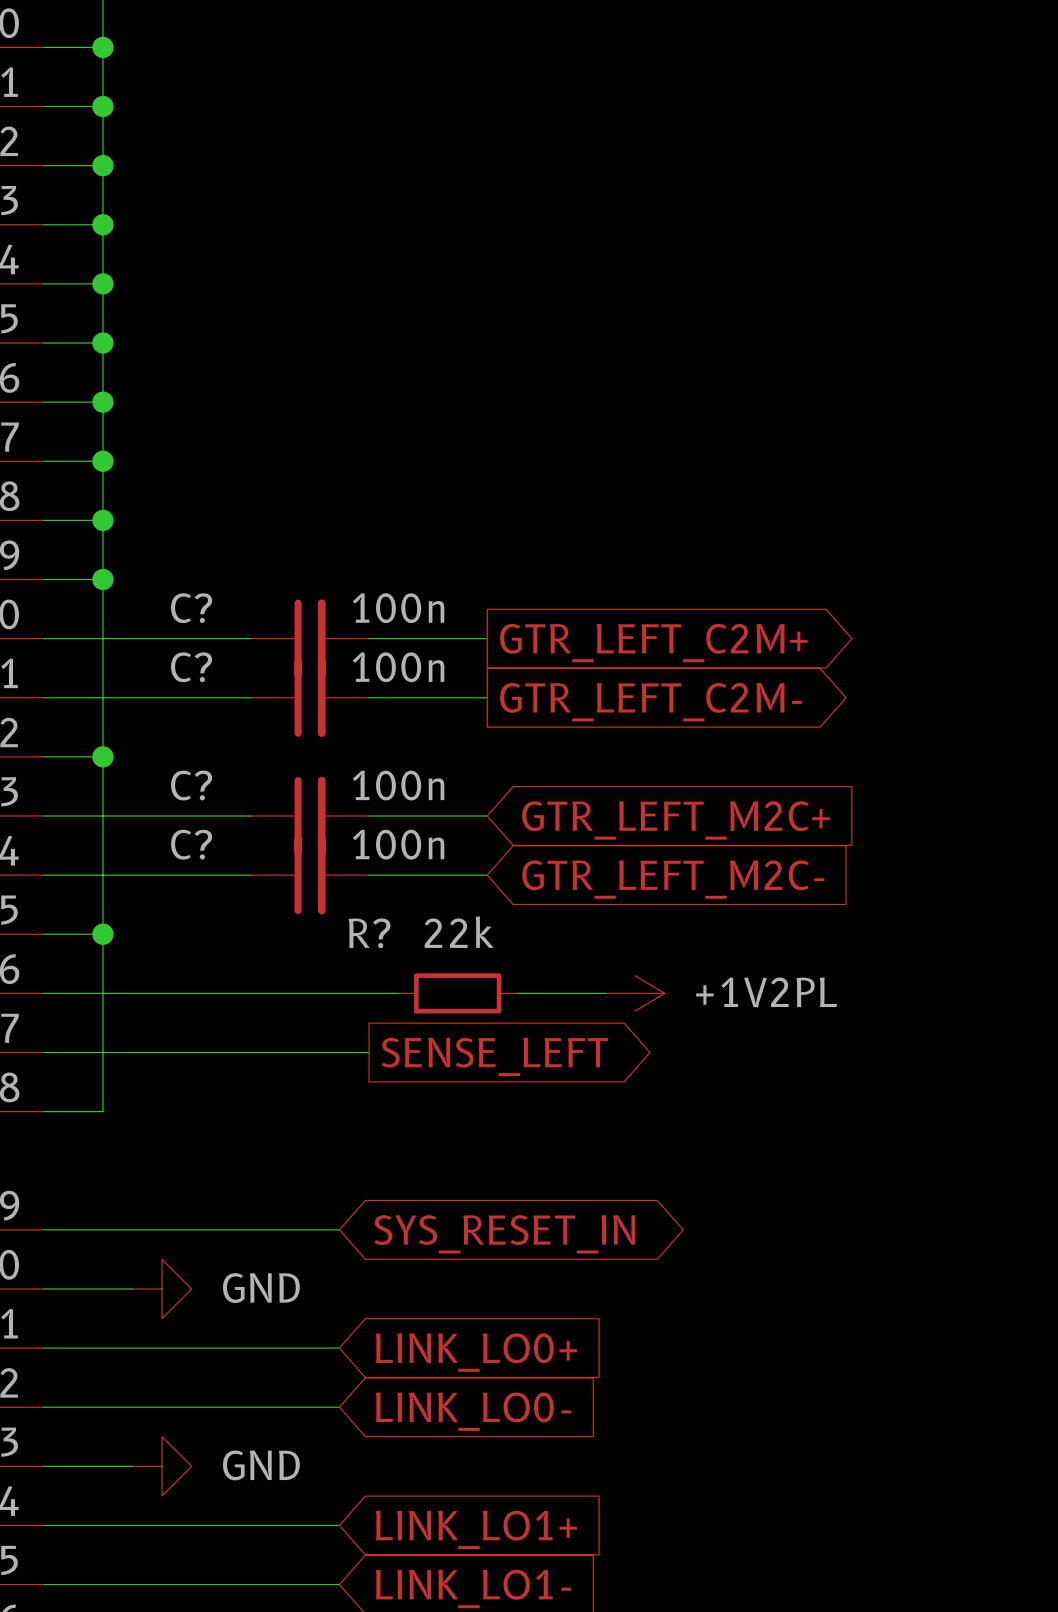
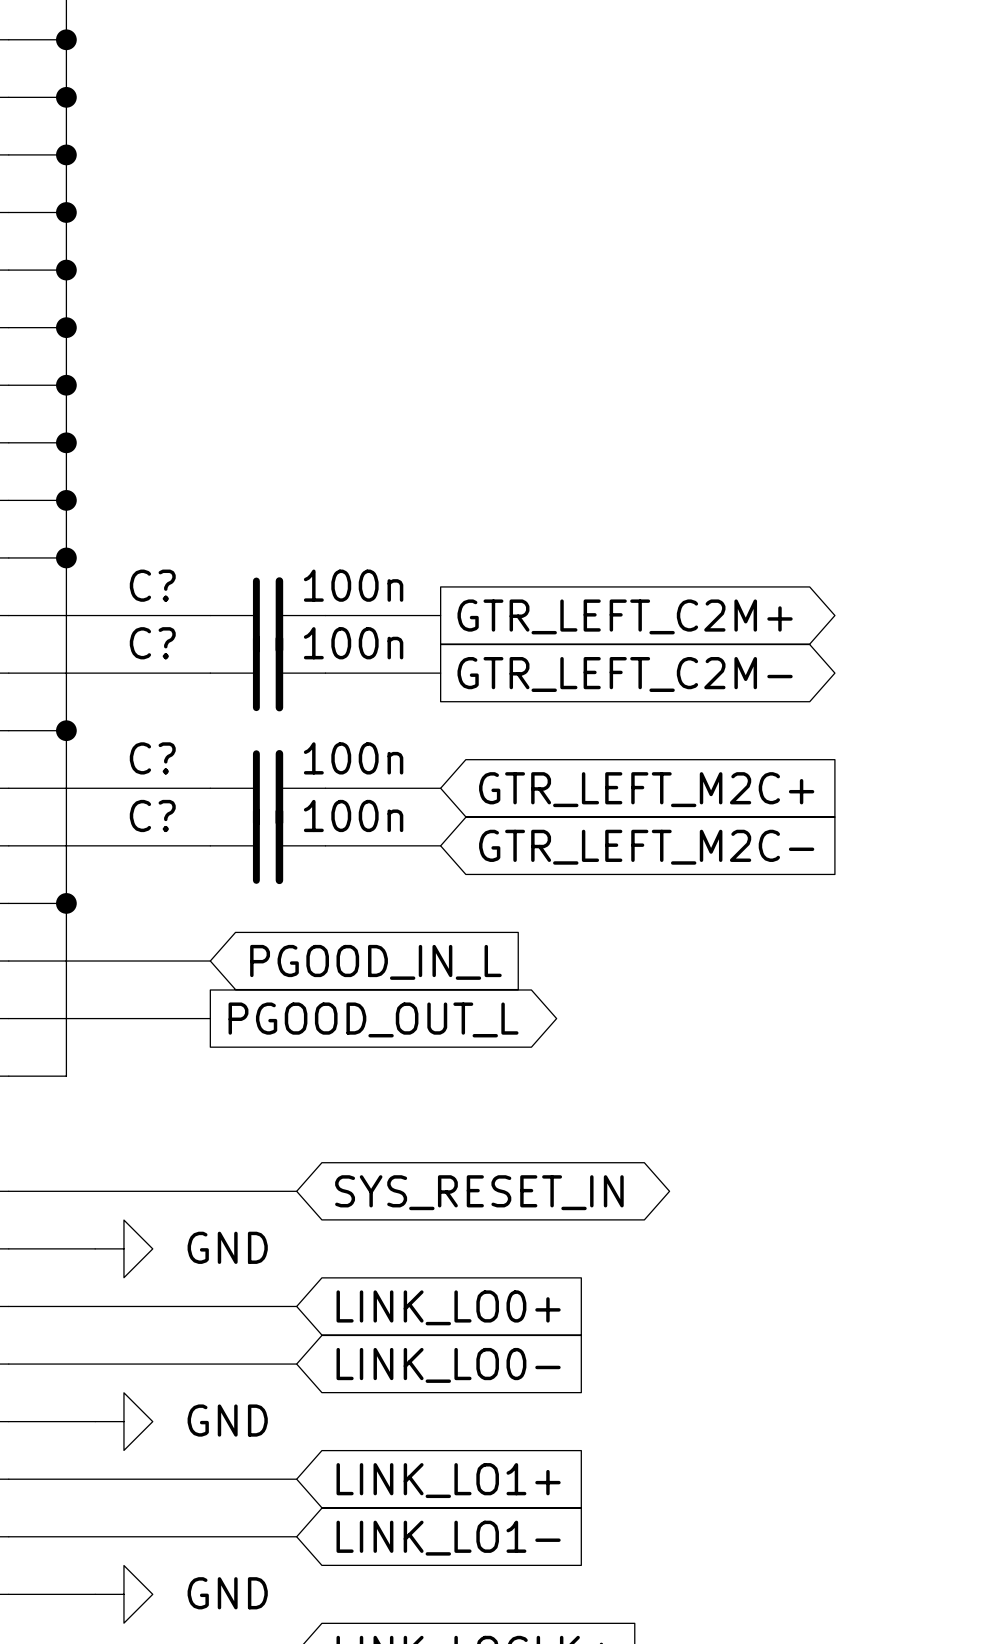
wire: (250, 993) (398, 993) -> none
R?: 22k (457, 993) -> none
wire: (516, 993) (605, 993) -> none
power symbol: +1V2PL (635, 993) -> none
global label: none -> PGOOD_IN_L (375, 962)
wire: (250, 1052) (369, 1052) -> none
global label: none -> PGOOD_OUT_L (373, 1019)
global label: SENSE_LEFT (494, 1056) -> none

